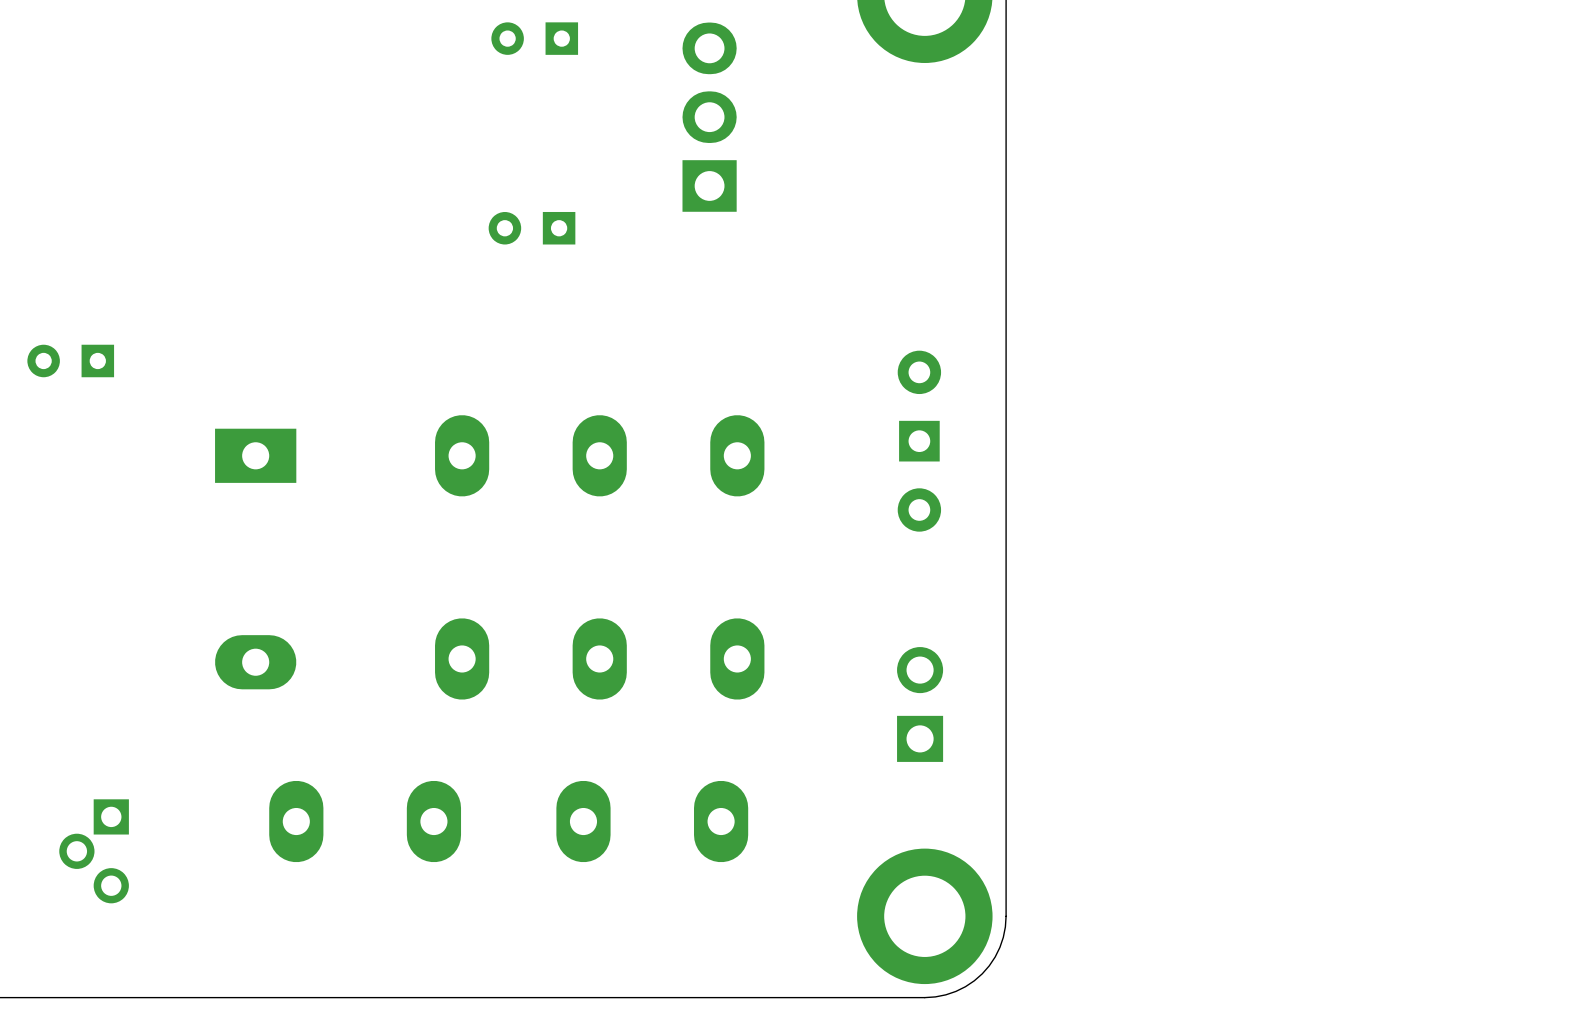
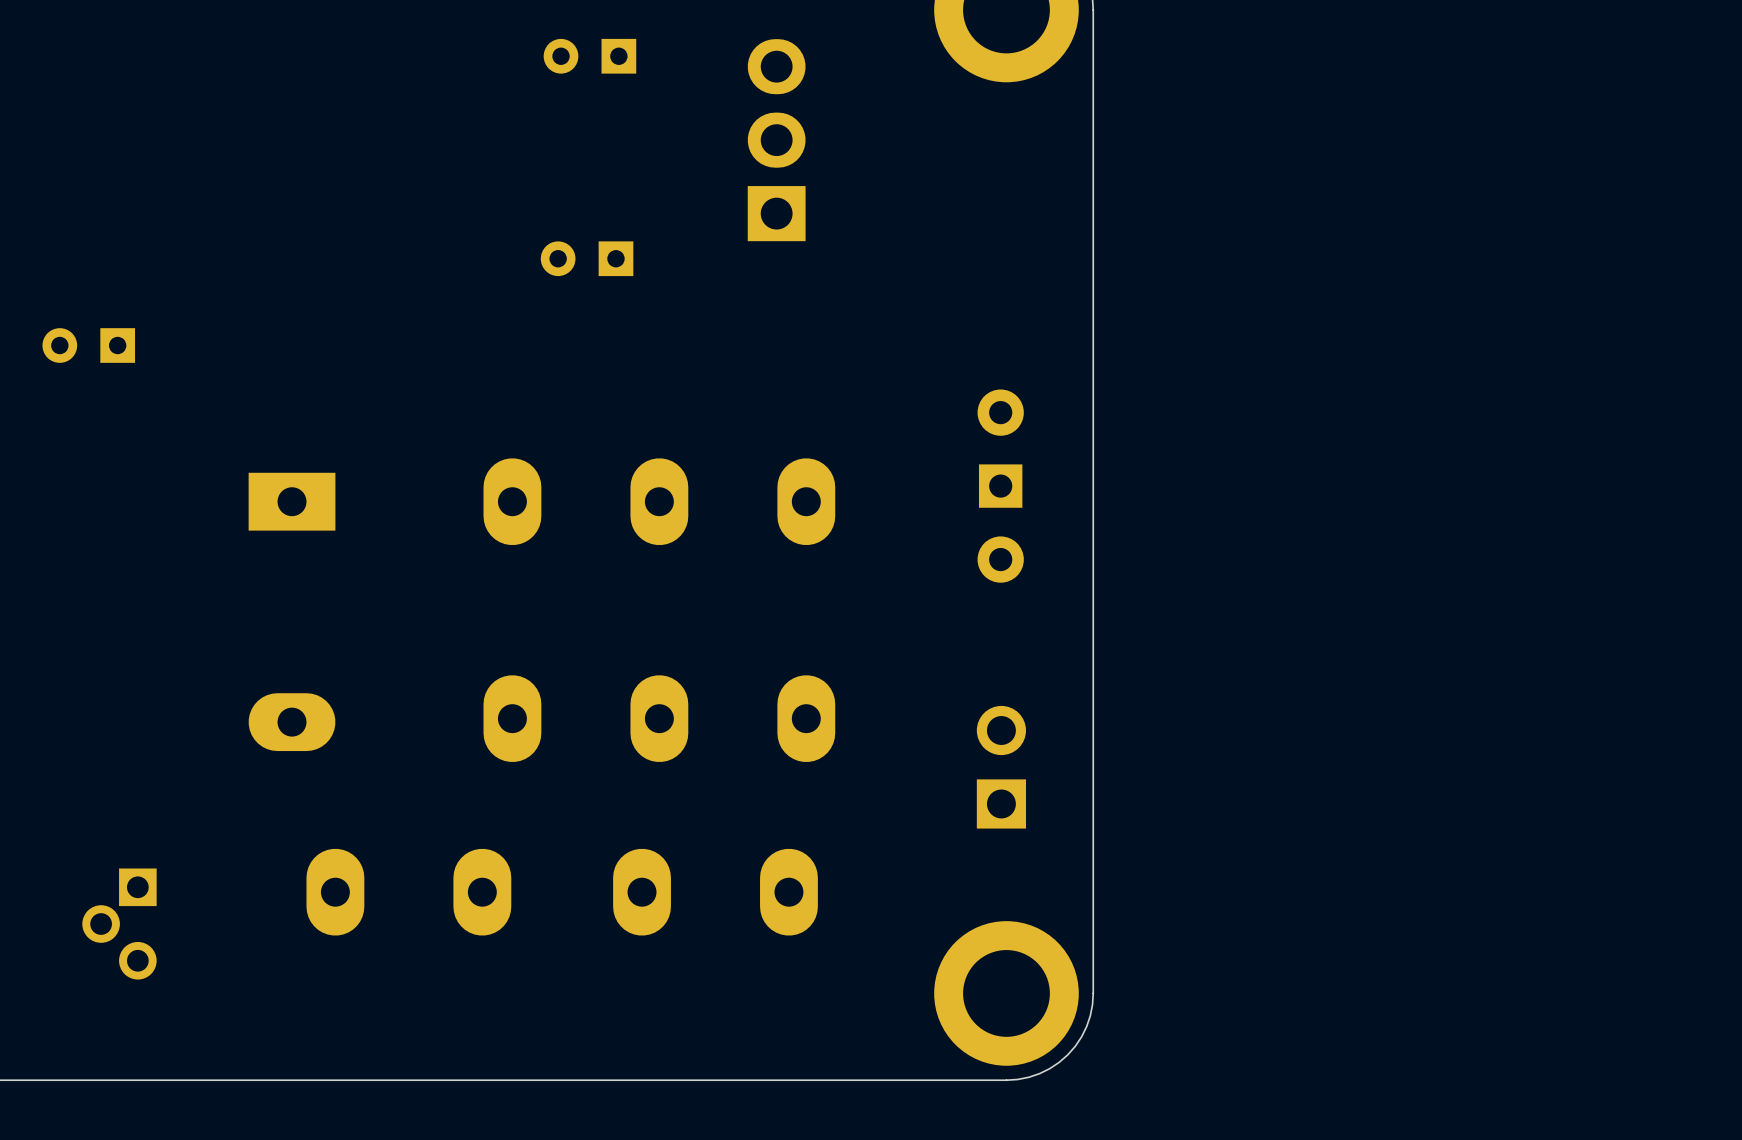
part position: (70, 360) -> (88, 345)

